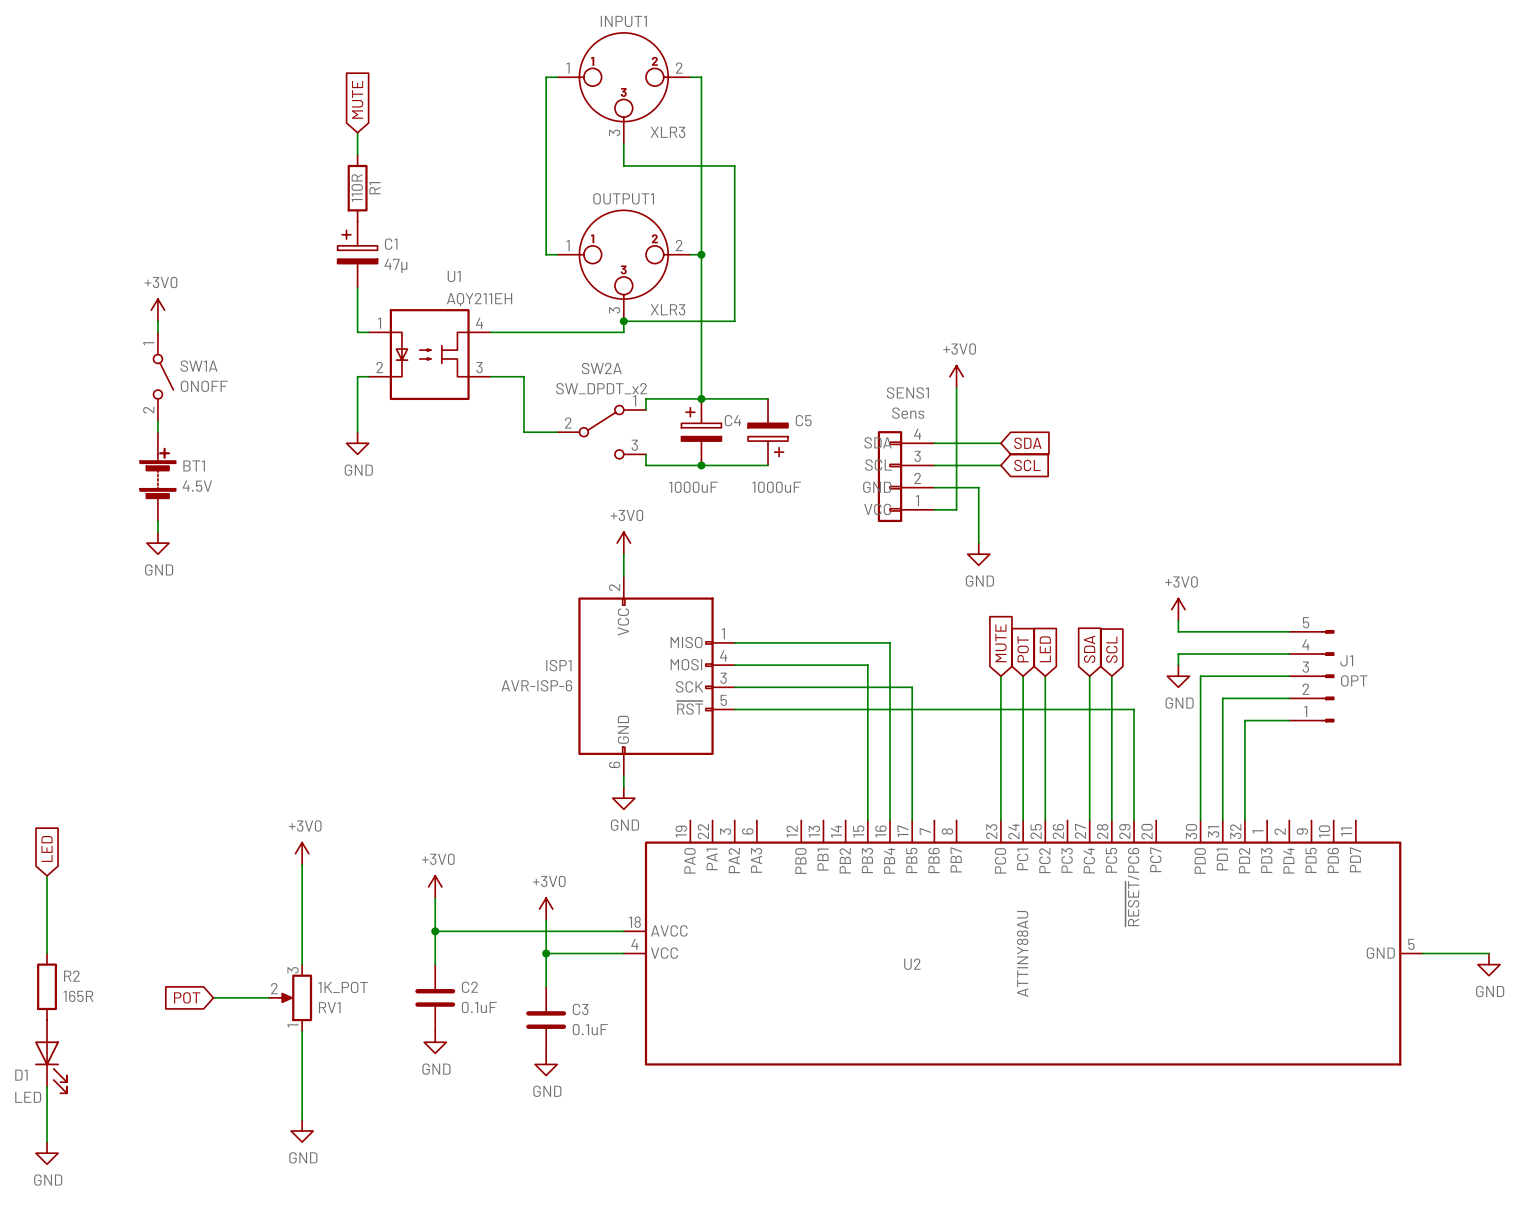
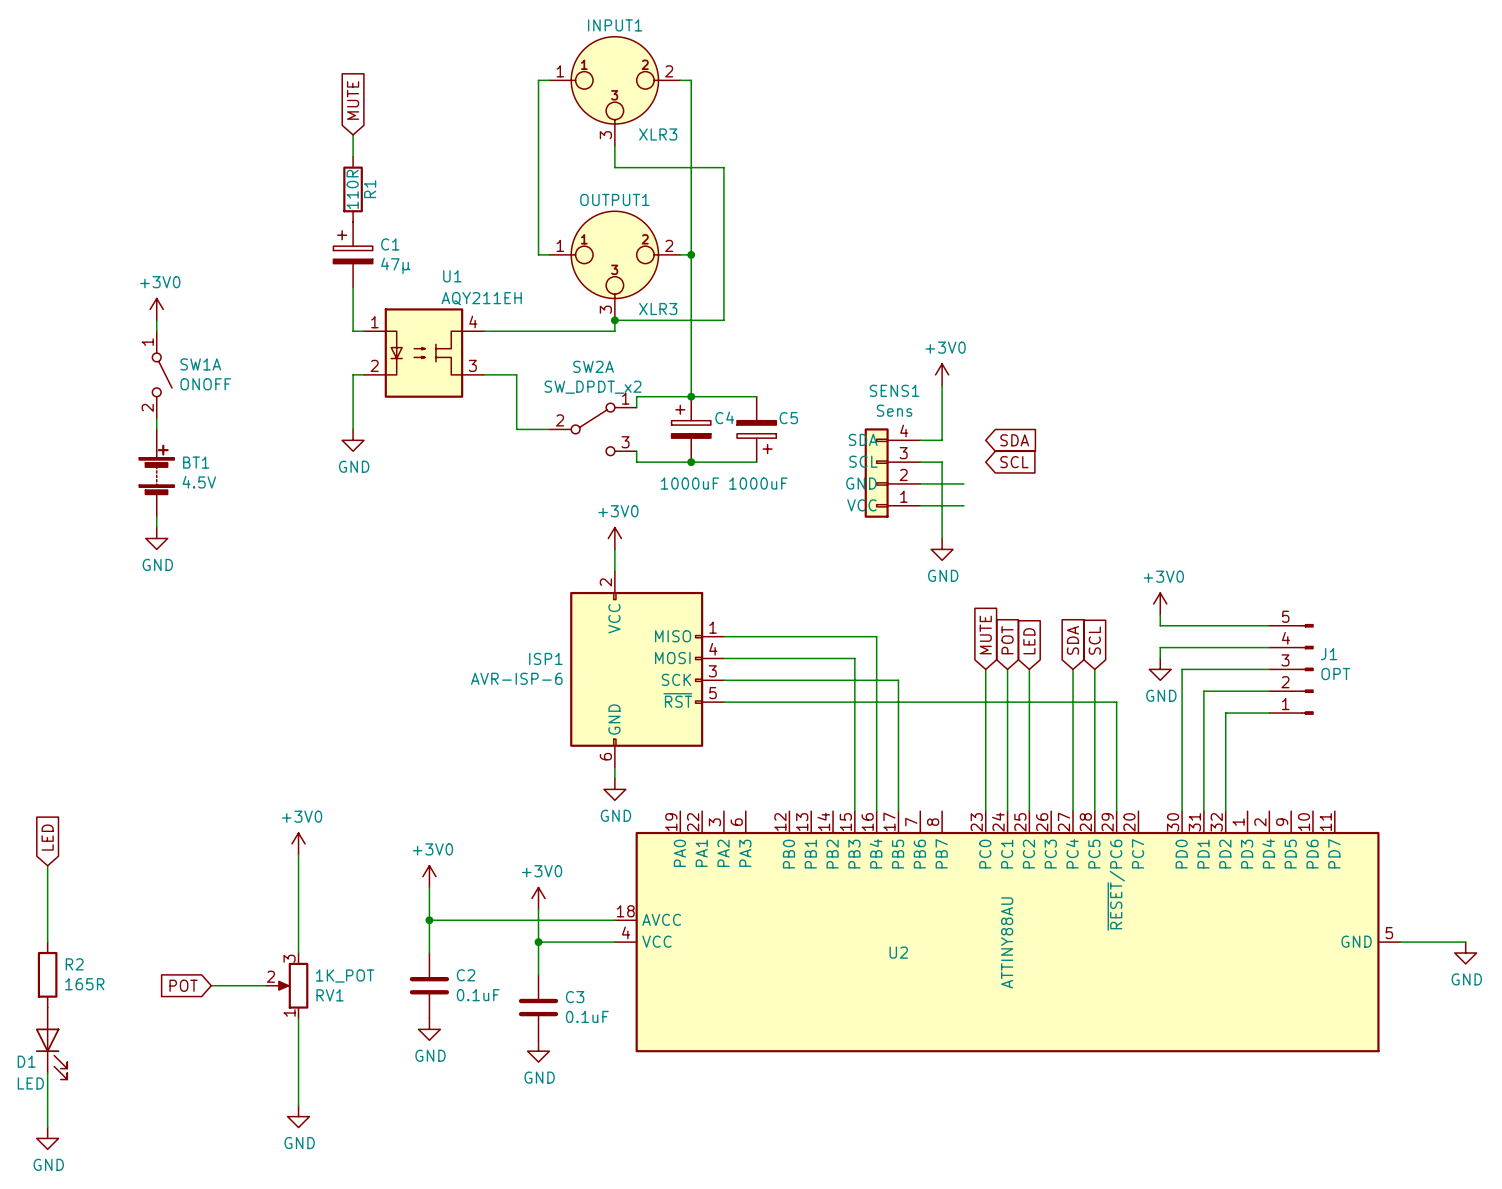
wire: (1000, 443) (956, 443) (956, 465) (1000, 465) -> none
wire: (978, 487) (978, 543) -> none
wire: none -> (963, 505) (942, 505) (942, 538)
power symbol position: GND (978, 554) -> GND (942, 549)

